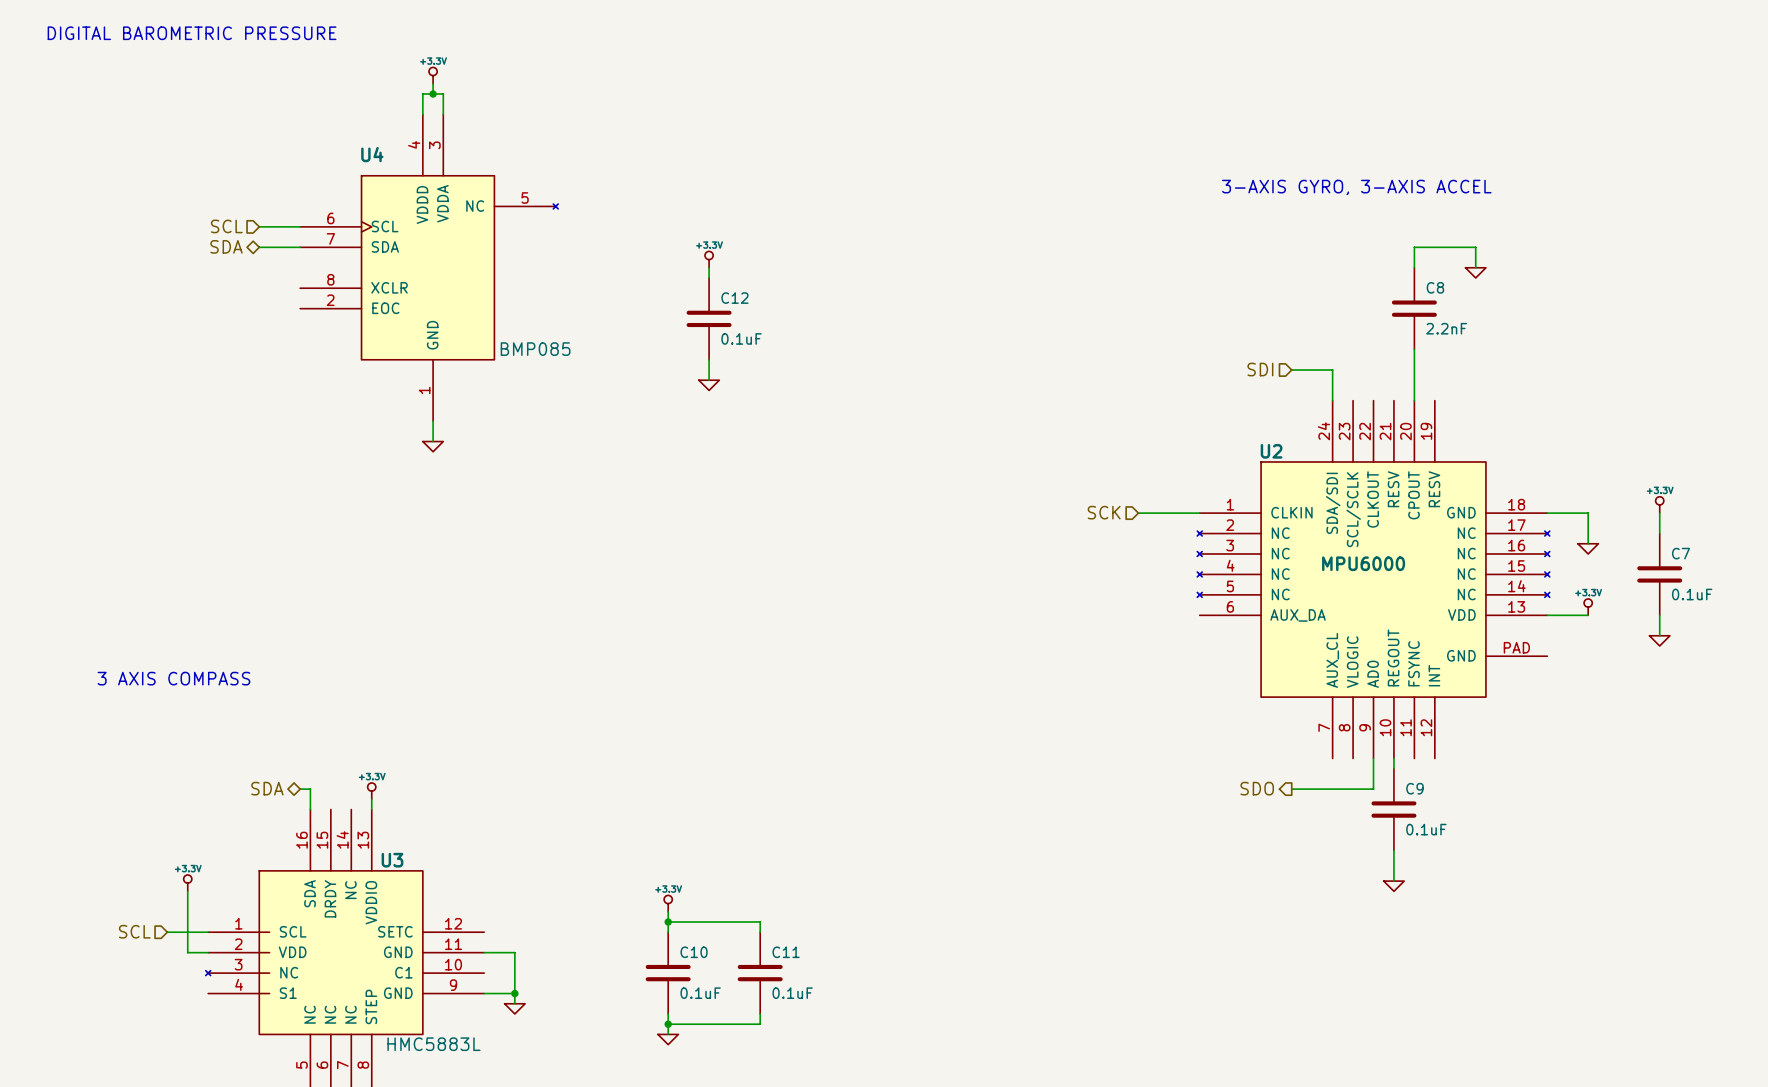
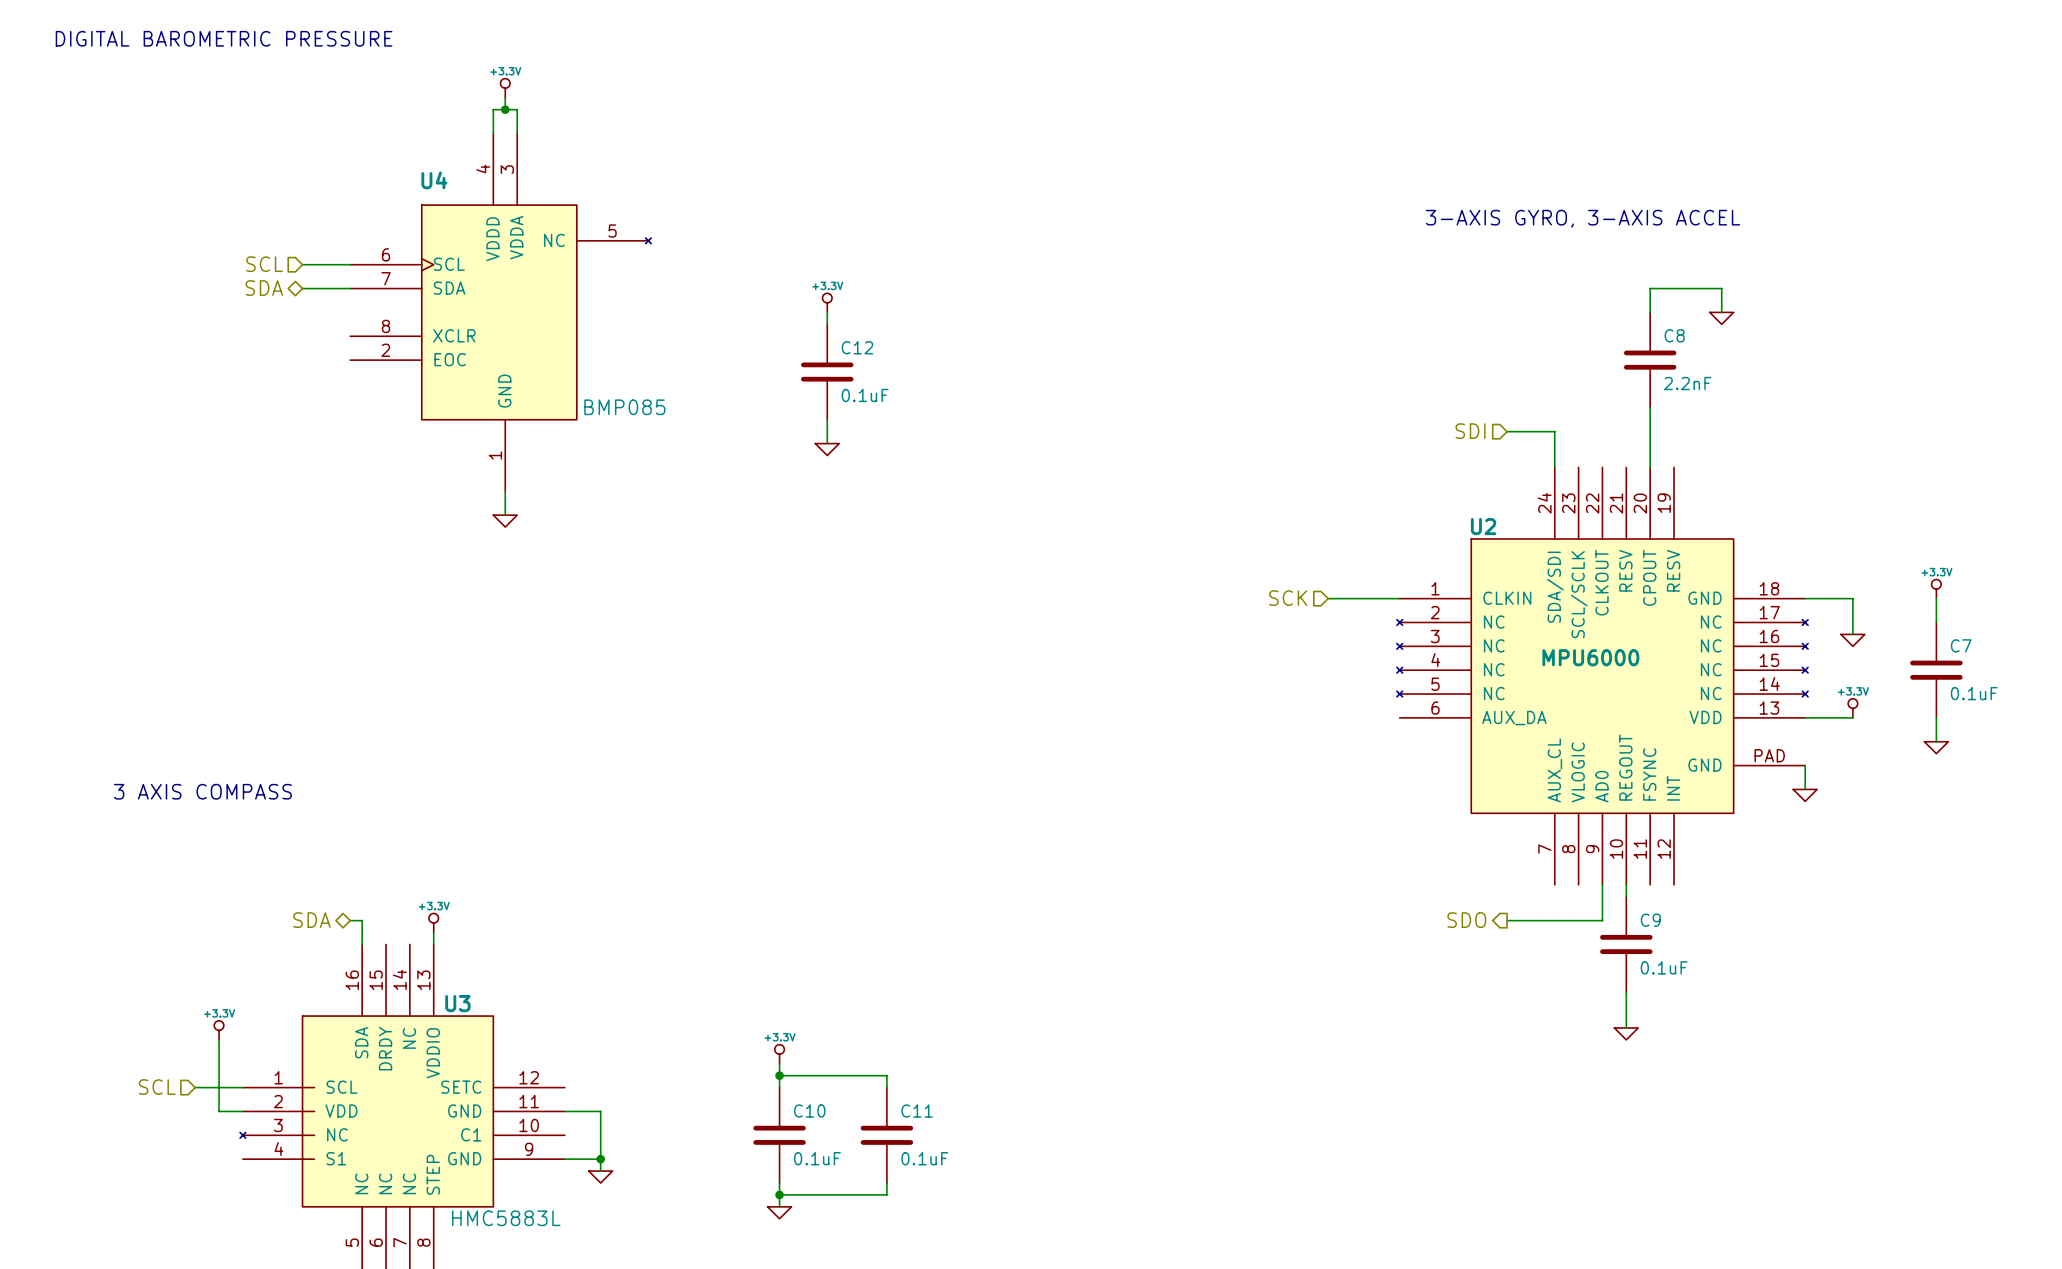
wire: none -> (1805, 765) (1805, 789)
power symbol: none -> (1805, 795)

